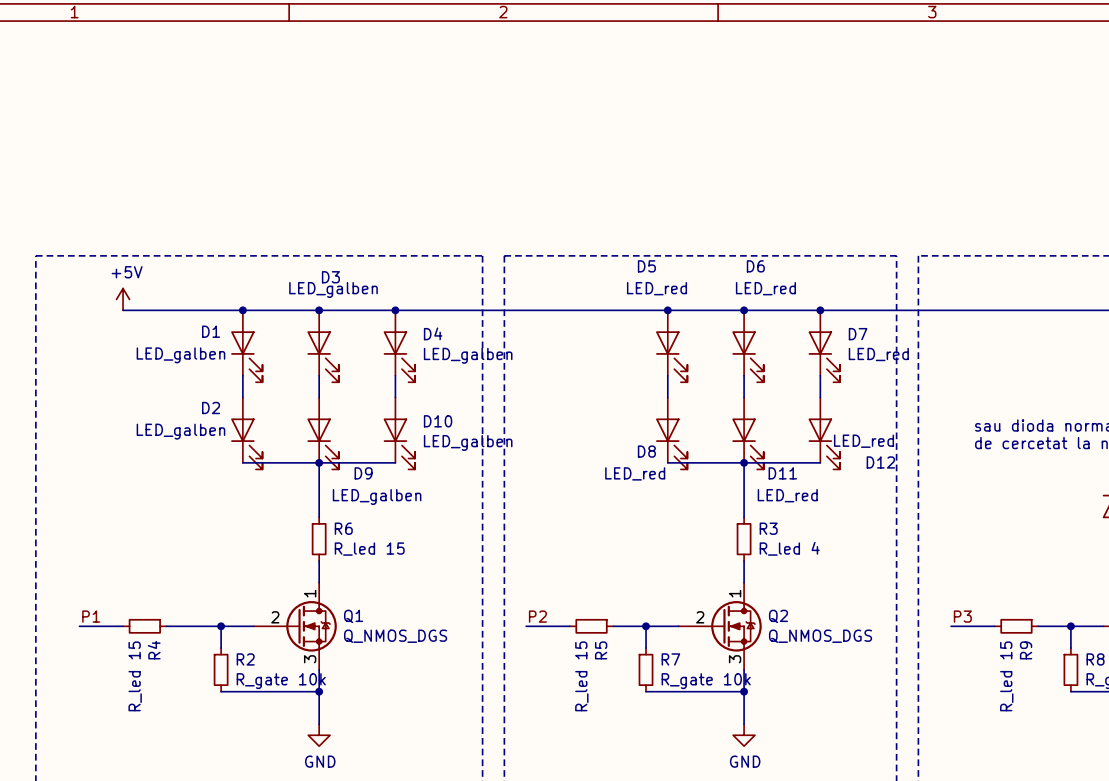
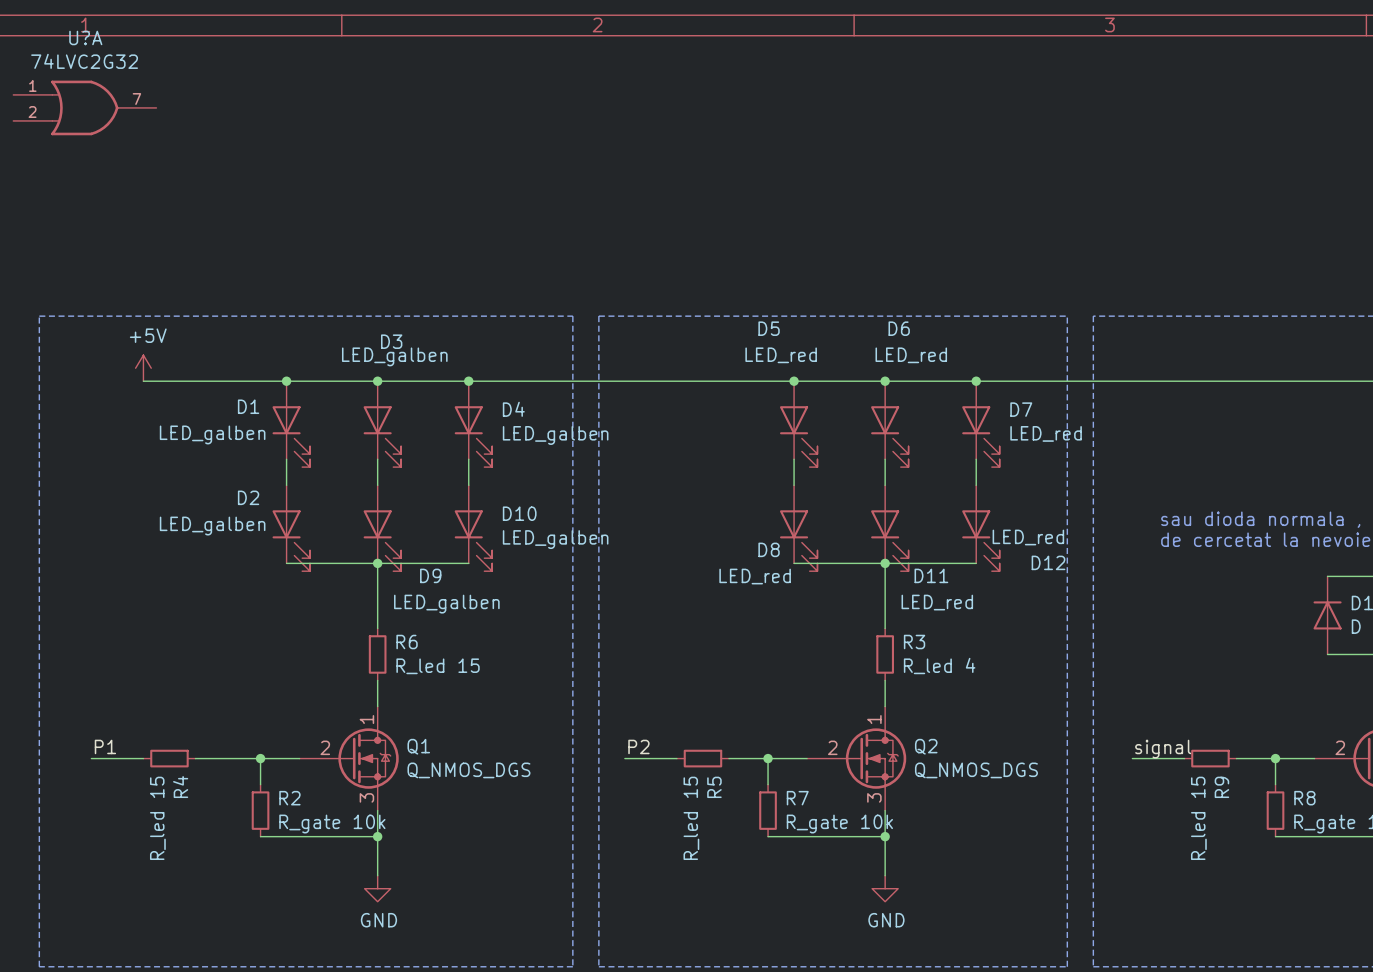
U?A: none -> 74LVC2G32 (84, 107)
label: P3 (962, 616) -> signal (1163, 749)

